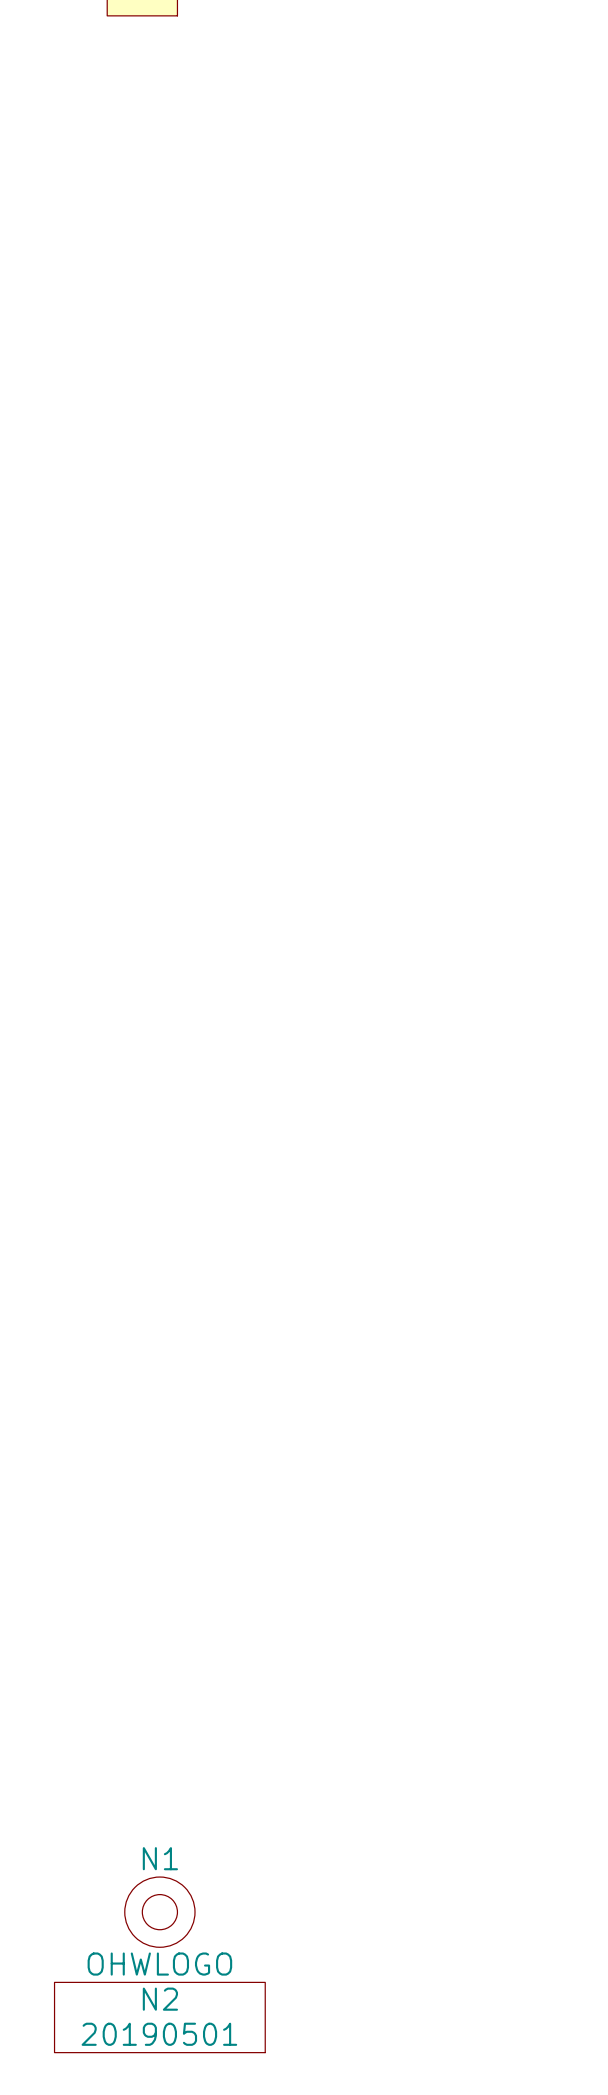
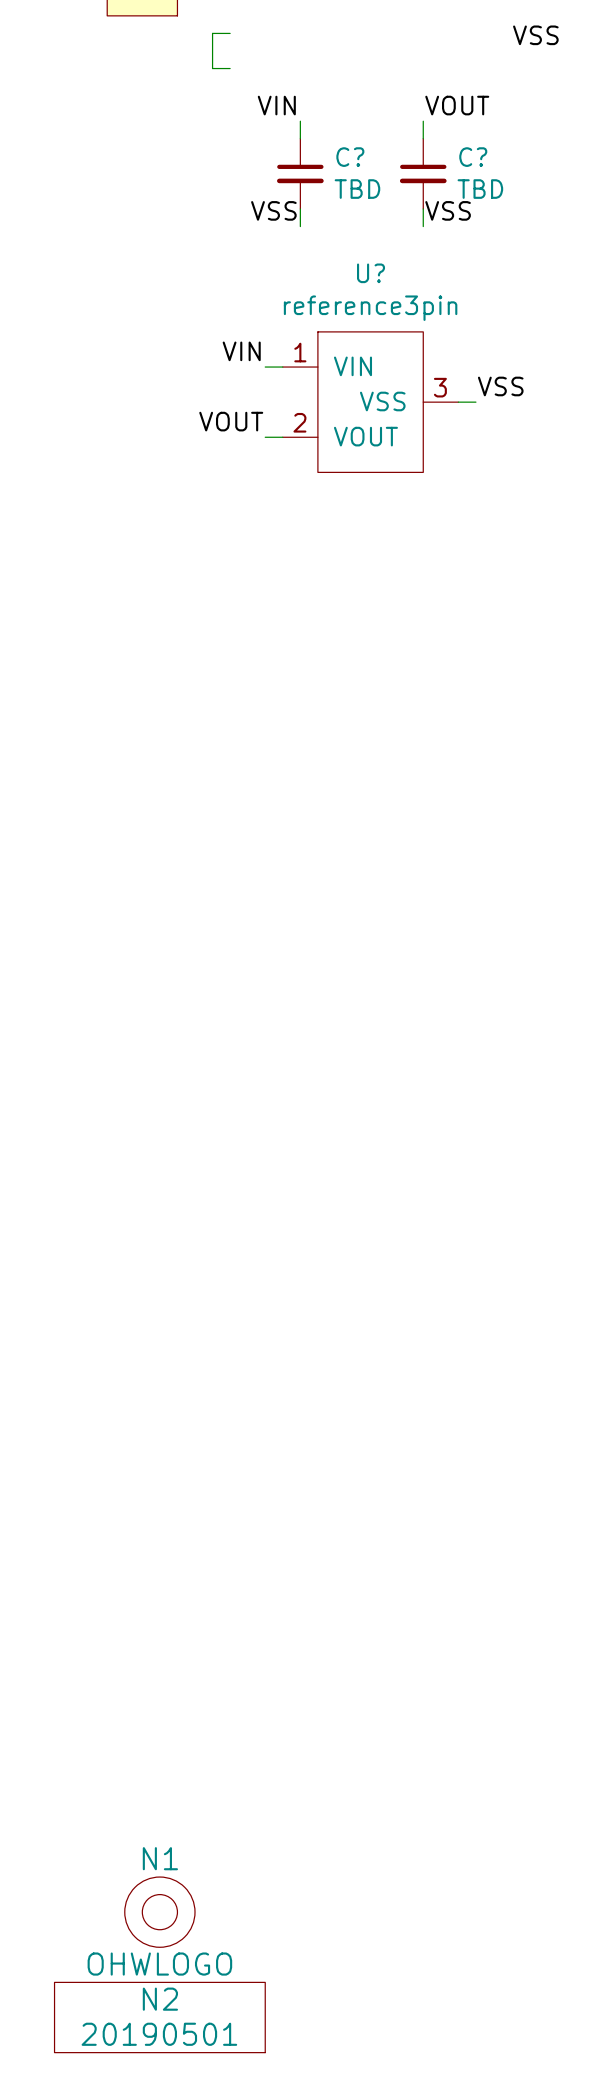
wire: none -> (230, 33) (212, 33) (212, 68) (230, 68)
label: none -> VSS (535, 35)
label: none -> VIN (276, 105)
label: none -> VOUT (457, 105)
wire: none -> (300, 121) (300, 138)
wire: none -> (423, 121) (423, 138)
C?: none -> TBD (300, 173)
C?: none -> TBD (423, 173)
wire: none -> (300, 209) (300, 226)
wire: none -> (423, 209) (423, 226)
label: none -> VSS (273, 210)
label: none -> VSS (448, 210)
label: none -> VIN (241, 351)
wire: none -> (265, 367) (282, 367)
label: none -> VSS (500, 386)
U?: none -> reference3pin (370, 402)
wire: none -> (458, 402) (475, 402)
label: none -> VOUT (231, 421)
wire: none -> (265, 437) (282, 437)

